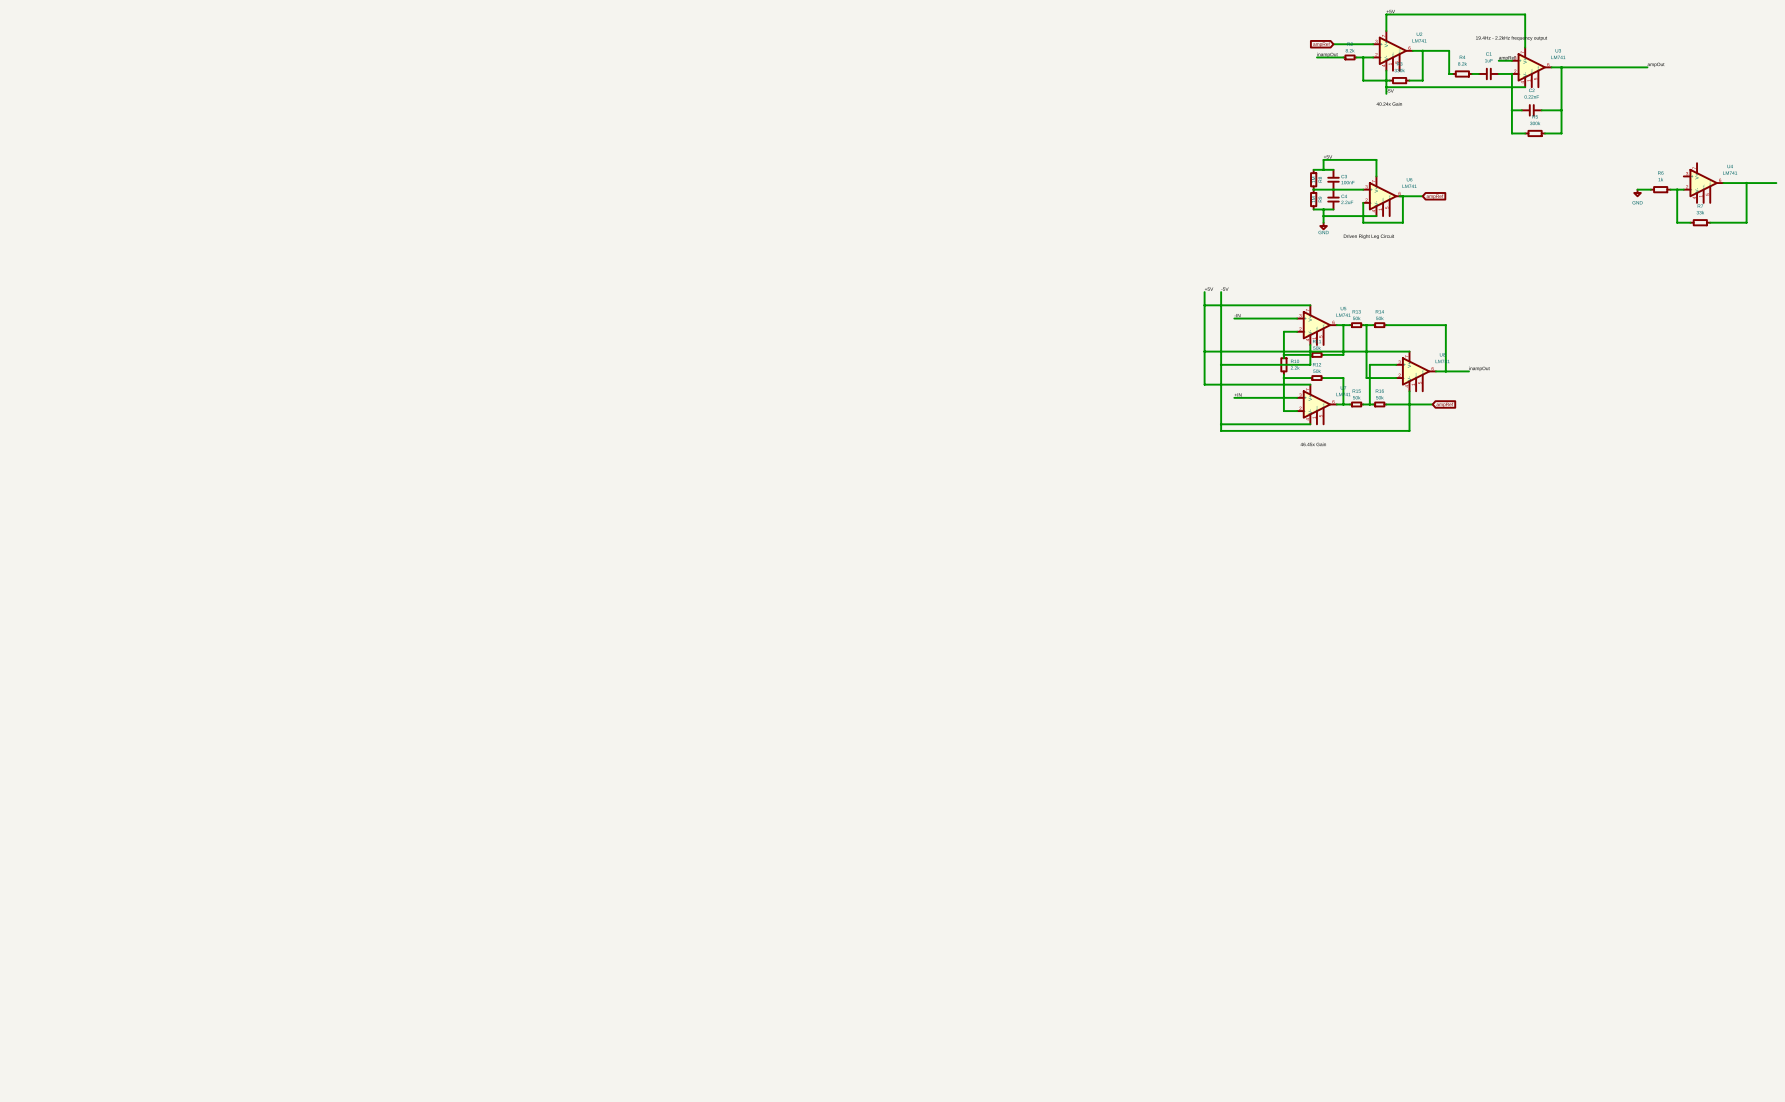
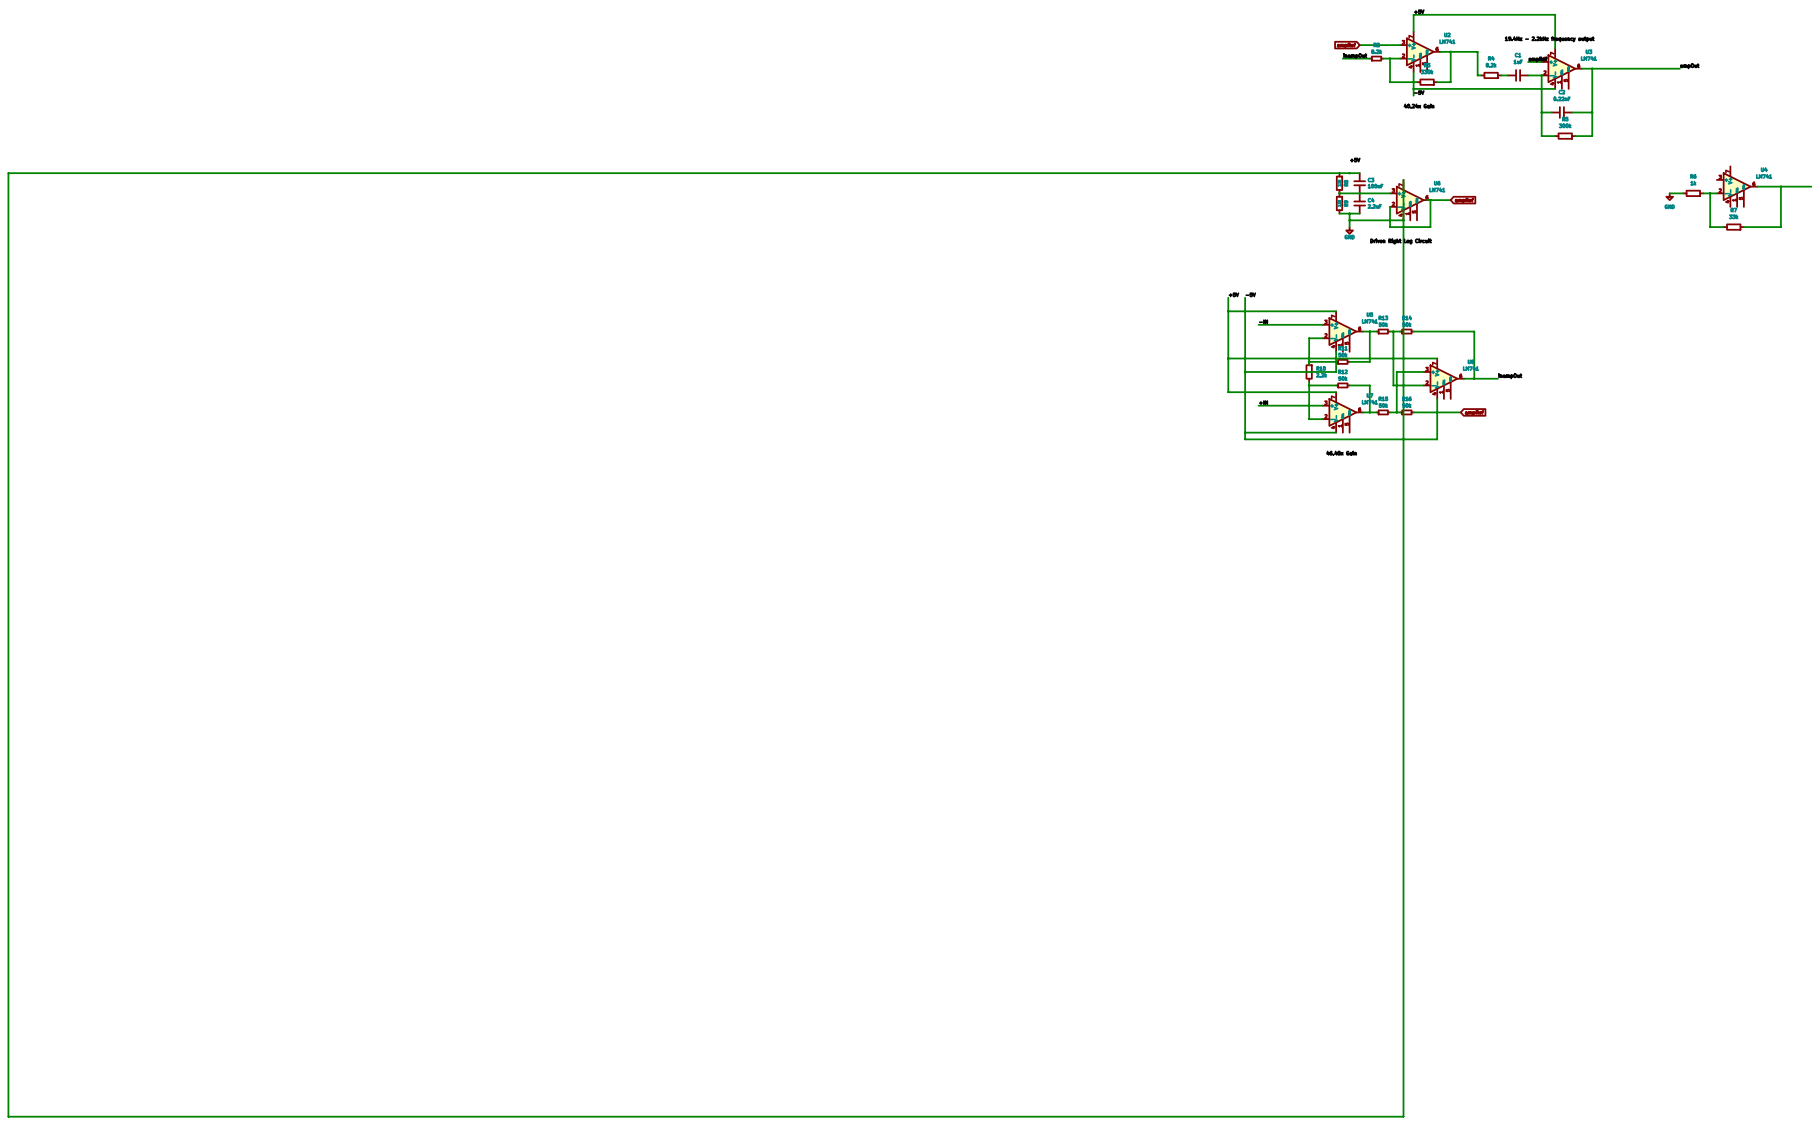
wire: (1323, 169) (1323, 159) (1376, 159) (1376, 176) -> (1339, 173) (8, 173) (8, 1116) (1403, 1116) (1403, 179)

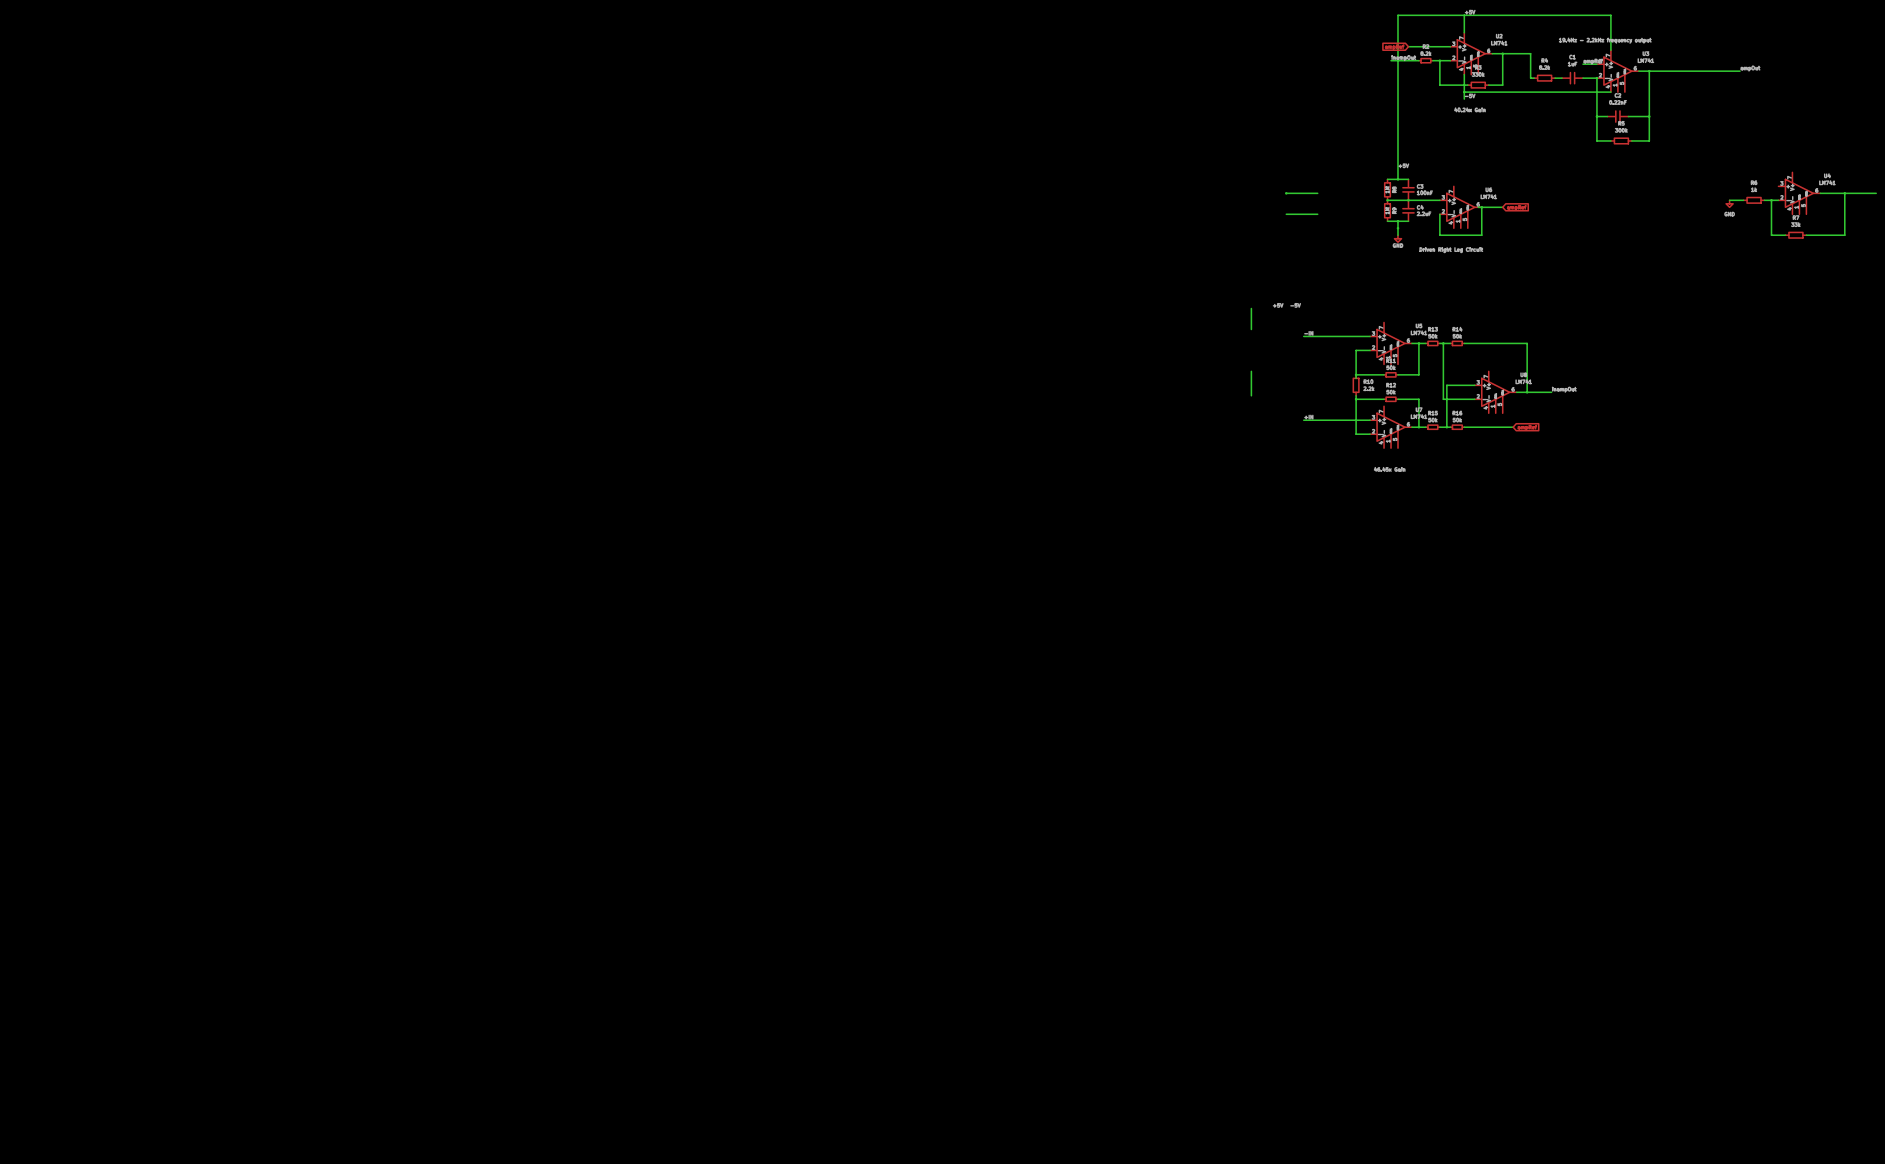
wire: none -> (1464, 15) (1397, 15) (1397, 179)
wire: (1339, 173) (8, 173) (8, 1116) (1403, 1116) (1403, 179) -> none
wire: none -> (1286, 193) (1317, 193)
junction: none -> (1286, 193)
wire: none -> (1286, 214) (1317, 214)
wire: (1349, 220) (1403, 220) -> none
wire: none -> (1251, 308) (1251, 329)
wire: (1228, 297) (1228, 392) (1336, 392) -> none
wire: (1245, 297) (1245, 439) (1437, 439) (1437, 398) -> none
wire: (1228, 311) (1336, 311) -> none
wire: (1336, 351) (1336, 371) (1245, 371) -> none
wire: none -> (1251, 371) (1251, 395)
wire: (1228, 358) (1437, 358) -> none
wire: (1245, 432) (1336, 432) -> none

